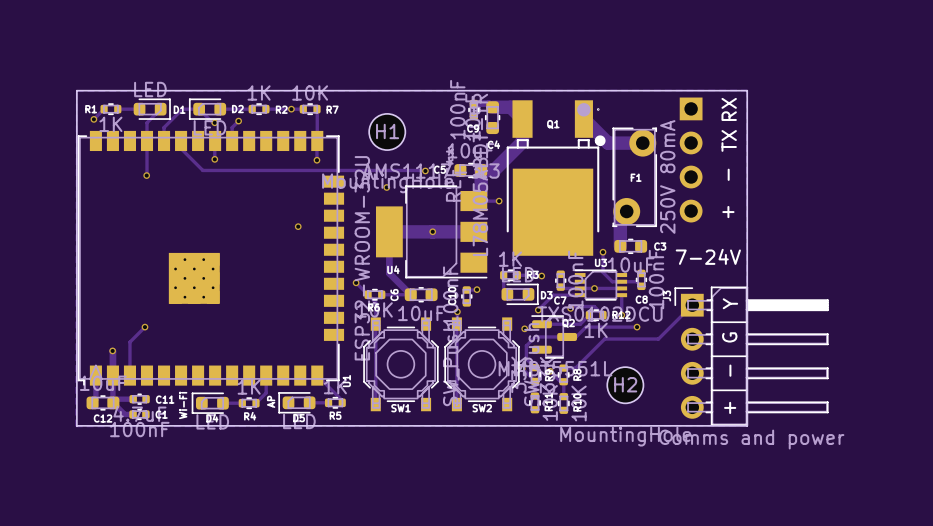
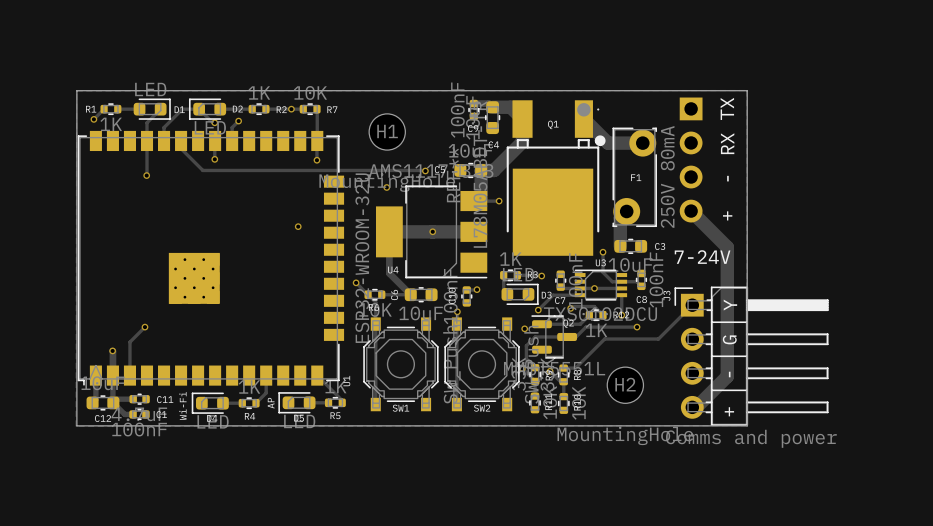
text: RX (729, 109) -> TX (727, 108)
text: TX (729, 140) -> RX (727, 143)
track: none -> (691, 211) (727, 247) (727, 376) (696, 407)

